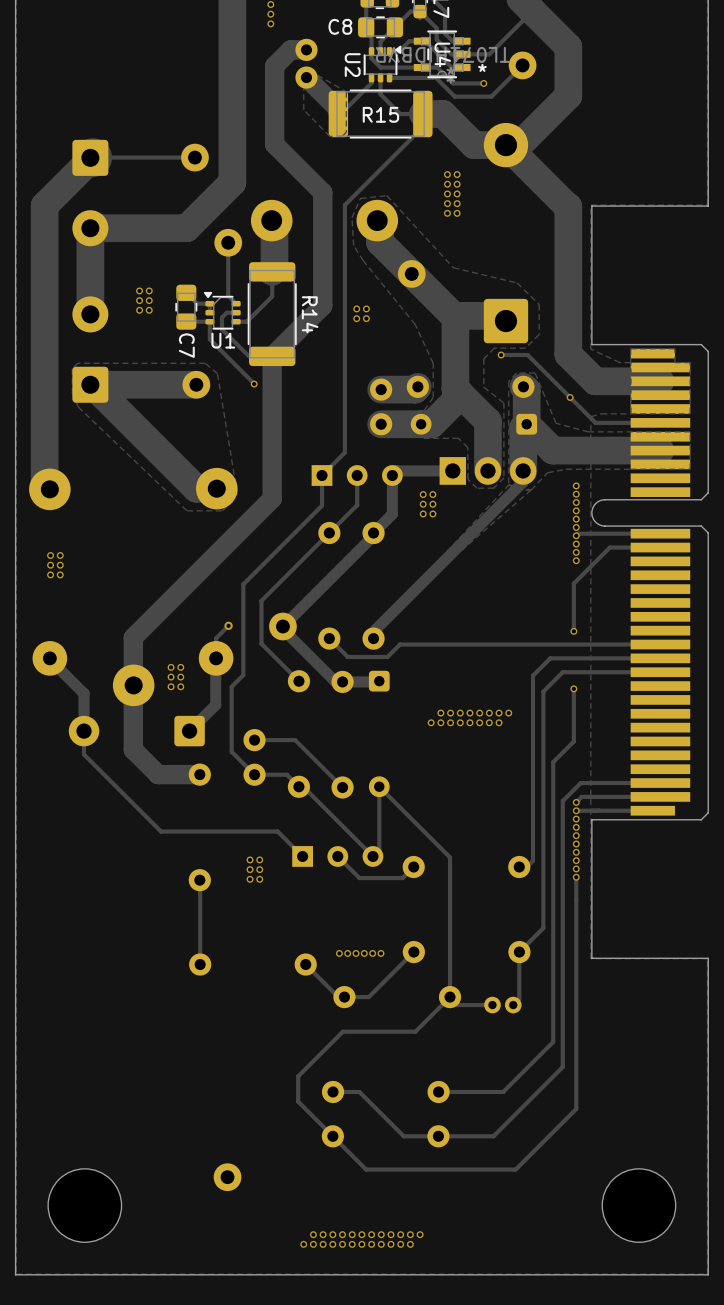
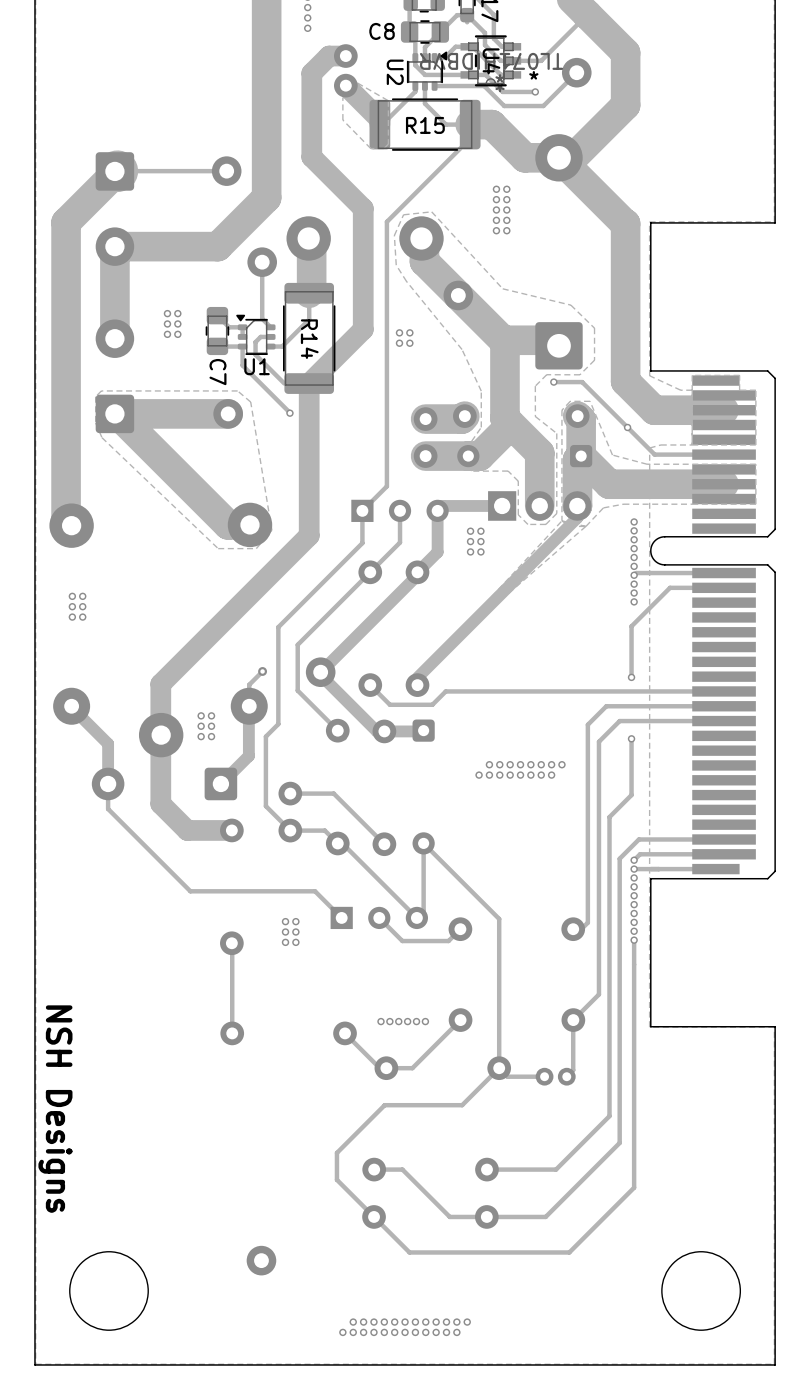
R14 name position: R14 (310, 314) -> R14 (309, 339)
text: none -> NSH Designs (55, 1109)

